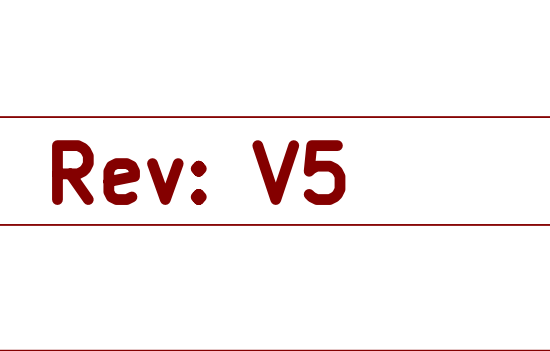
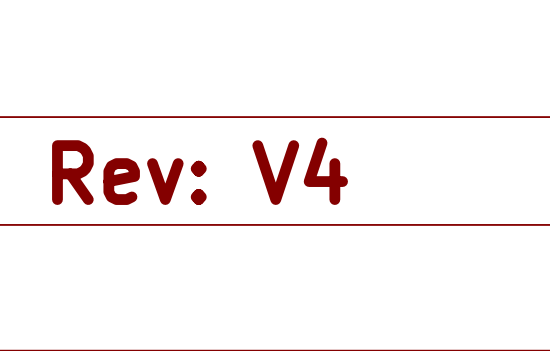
title block: Rev: V5 (198, 172) -> Rev: V4 (200, 171)

